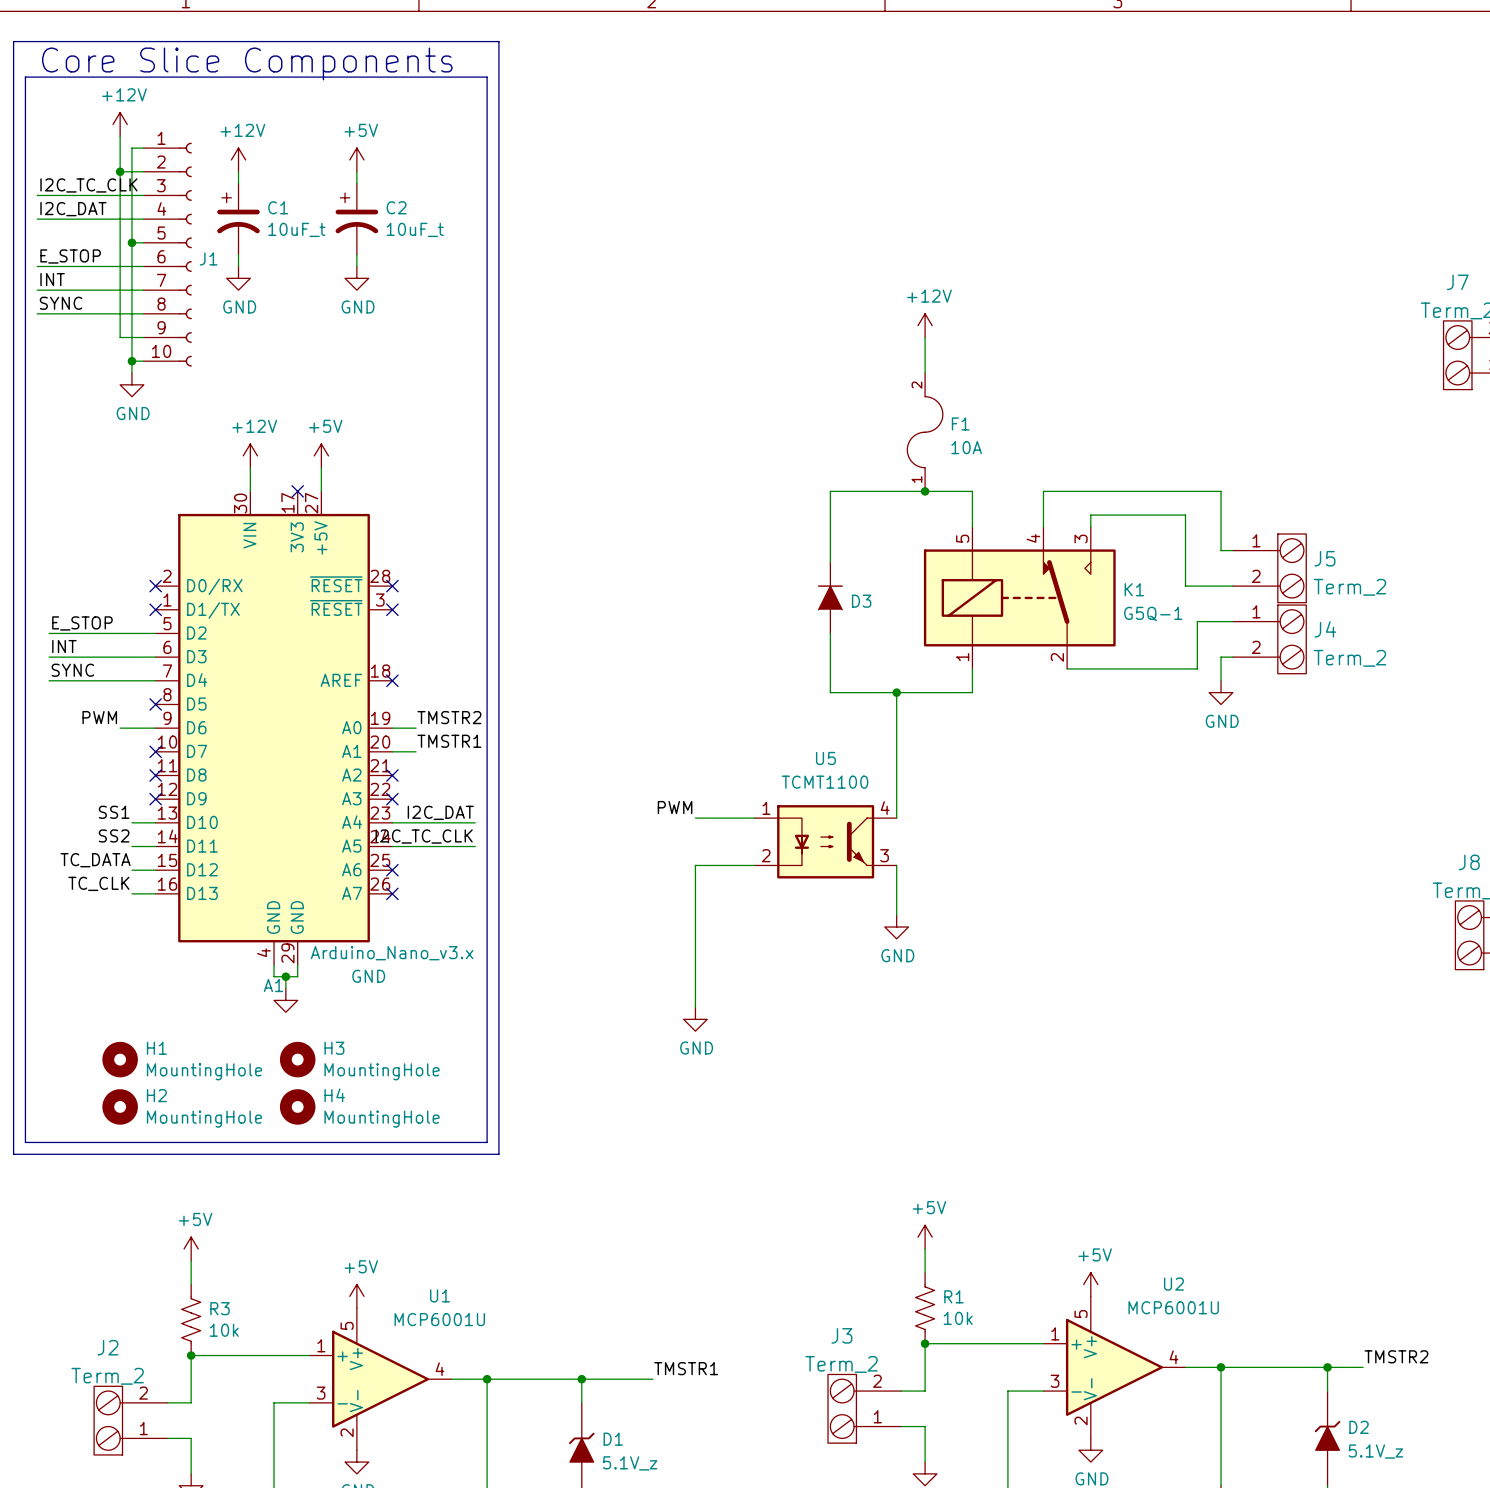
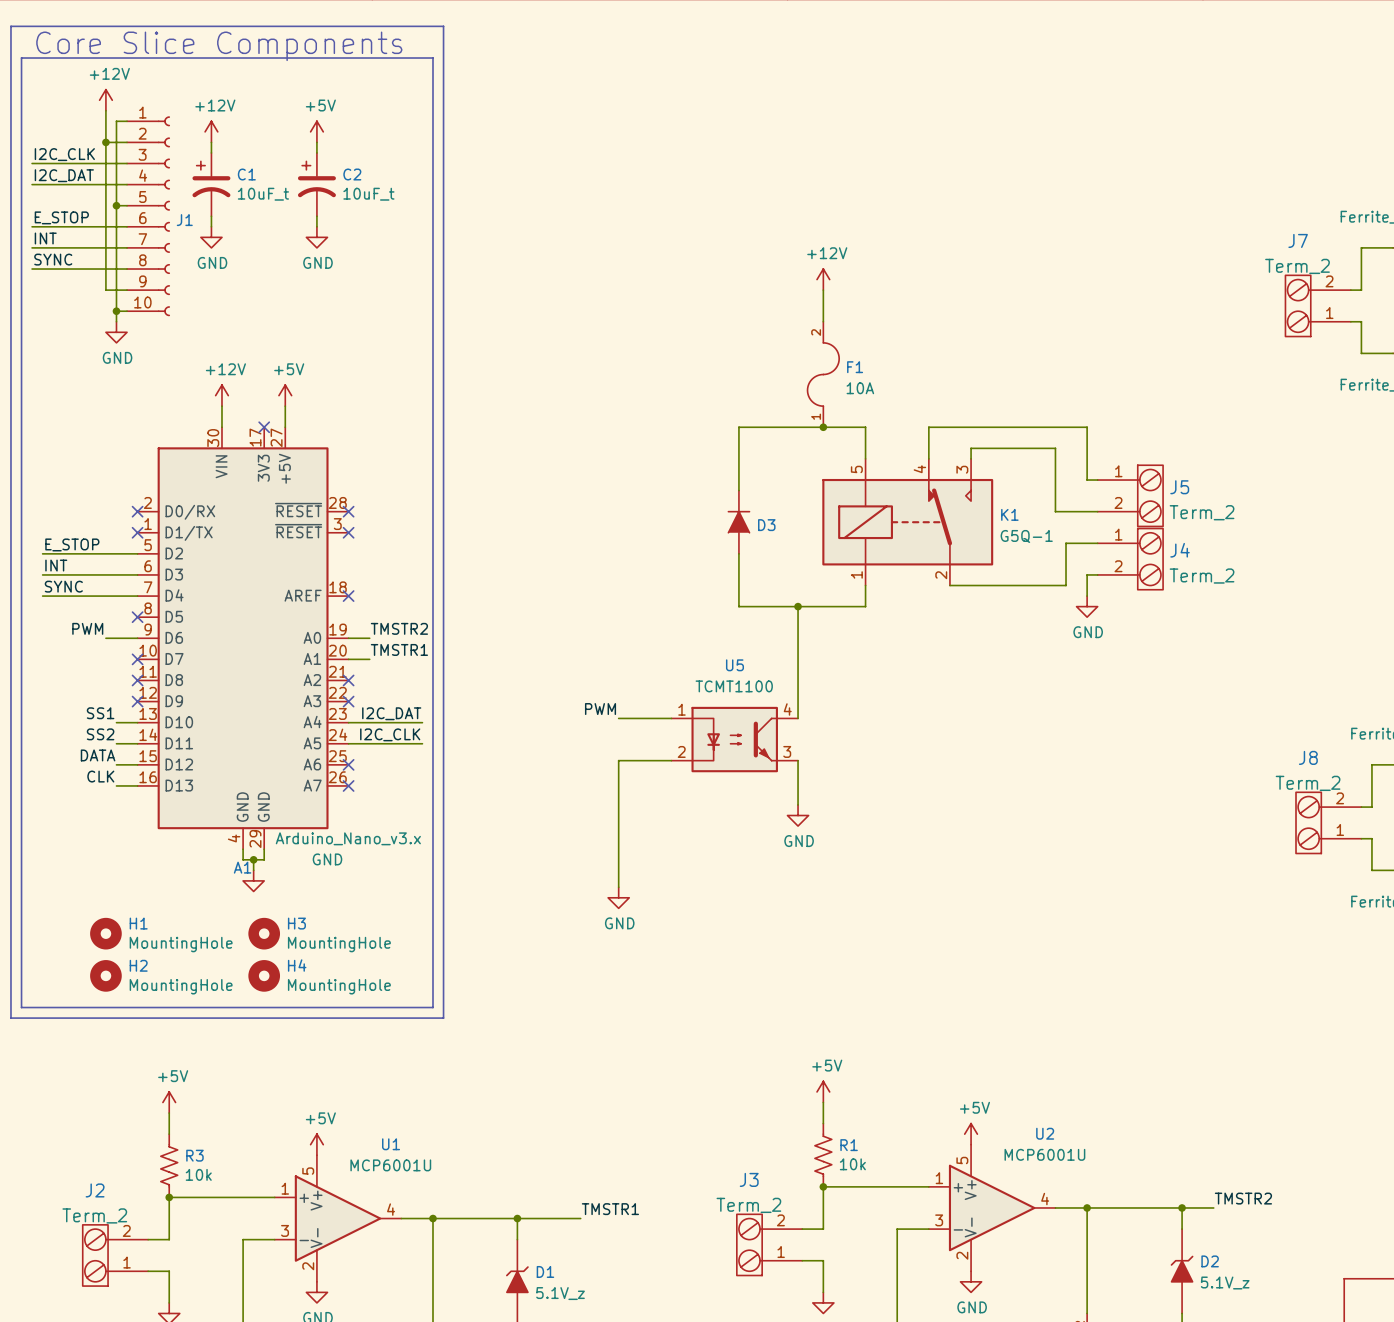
label: I2C_TC_CLK (88, 185) -> I2C_CLK (64, 154)
label: I2C_TC_CLK (424, 836) -> I2C_CLK (390, 734)
label: TC_DATA (95, 860) -> DATA (98, 755)
label: TC_CLK (98, 883) -> CLK (100, 776)

